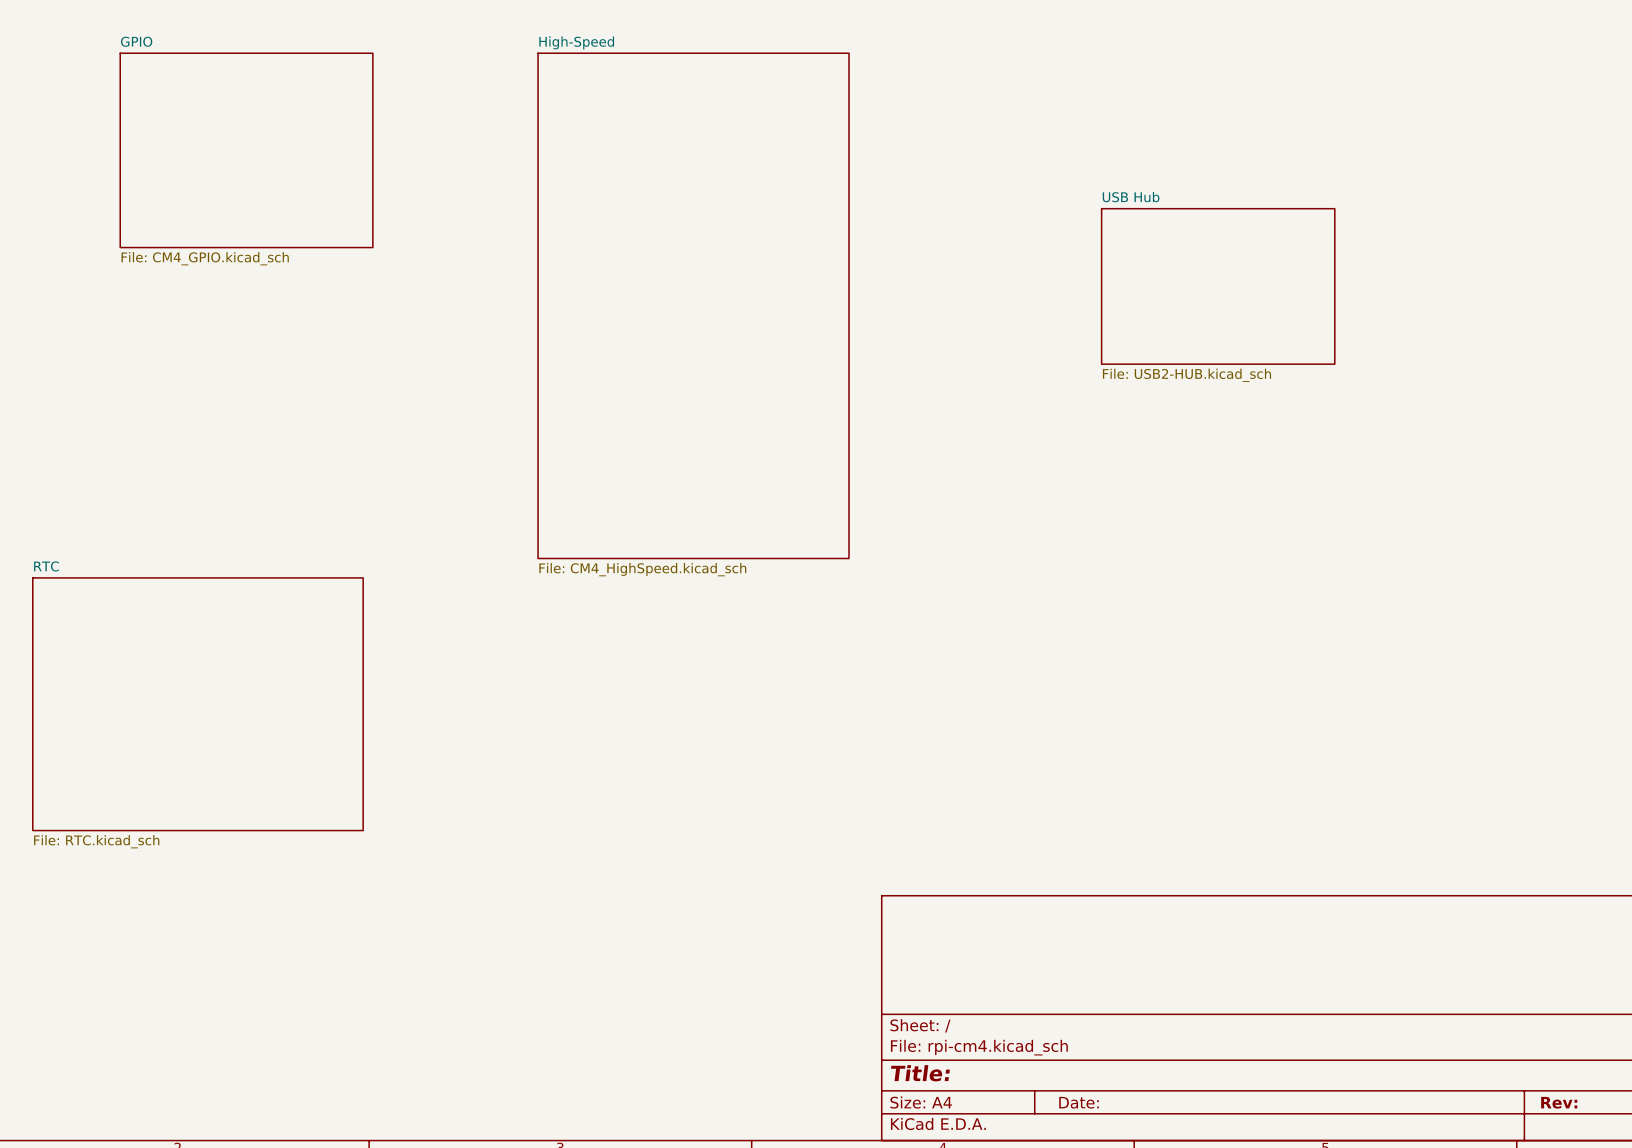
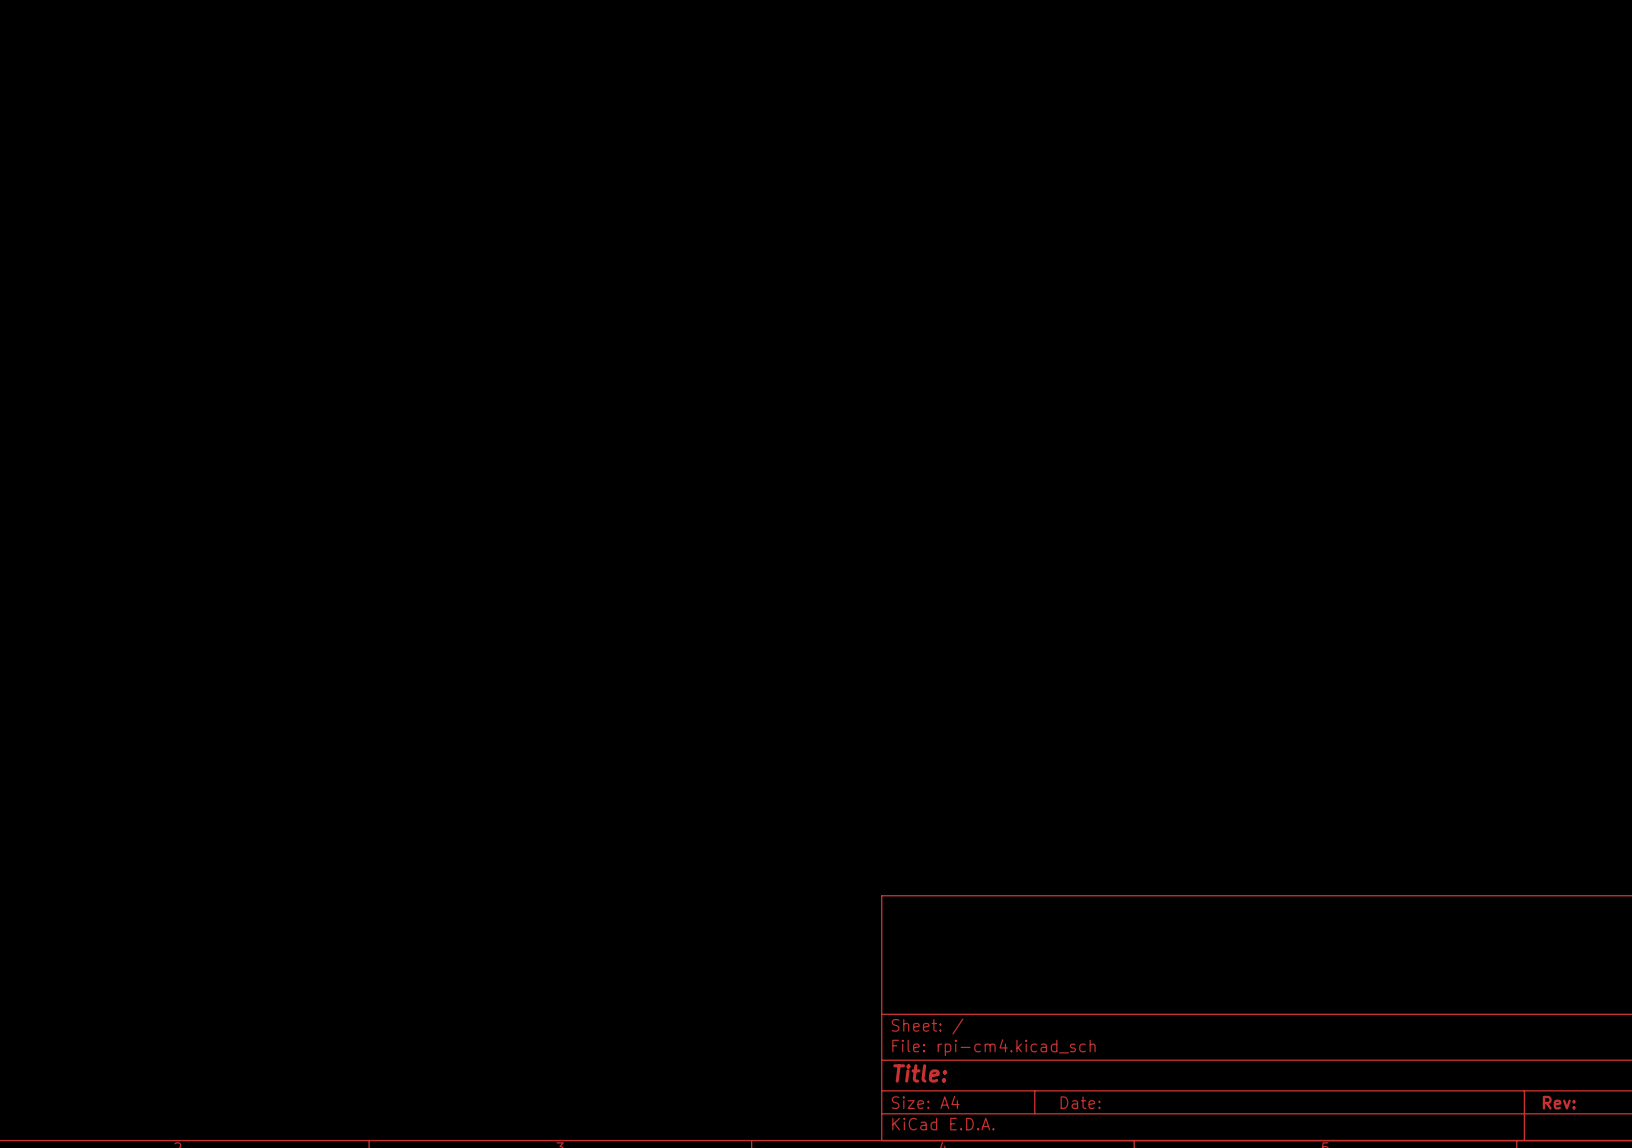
sheet GPIO: File: CM4_GPIO.kicad_sch (246, 150) -> none
sheet USB Hub: File: USB2-HUB.kicad_sch (1218, 286) -> none
sheet High-Speed: File: CM4_HighSpeed.kicad_sch (693, 305) -> none
sheet RTC: File: RTC.kicad_sch (197, 704) -> none

